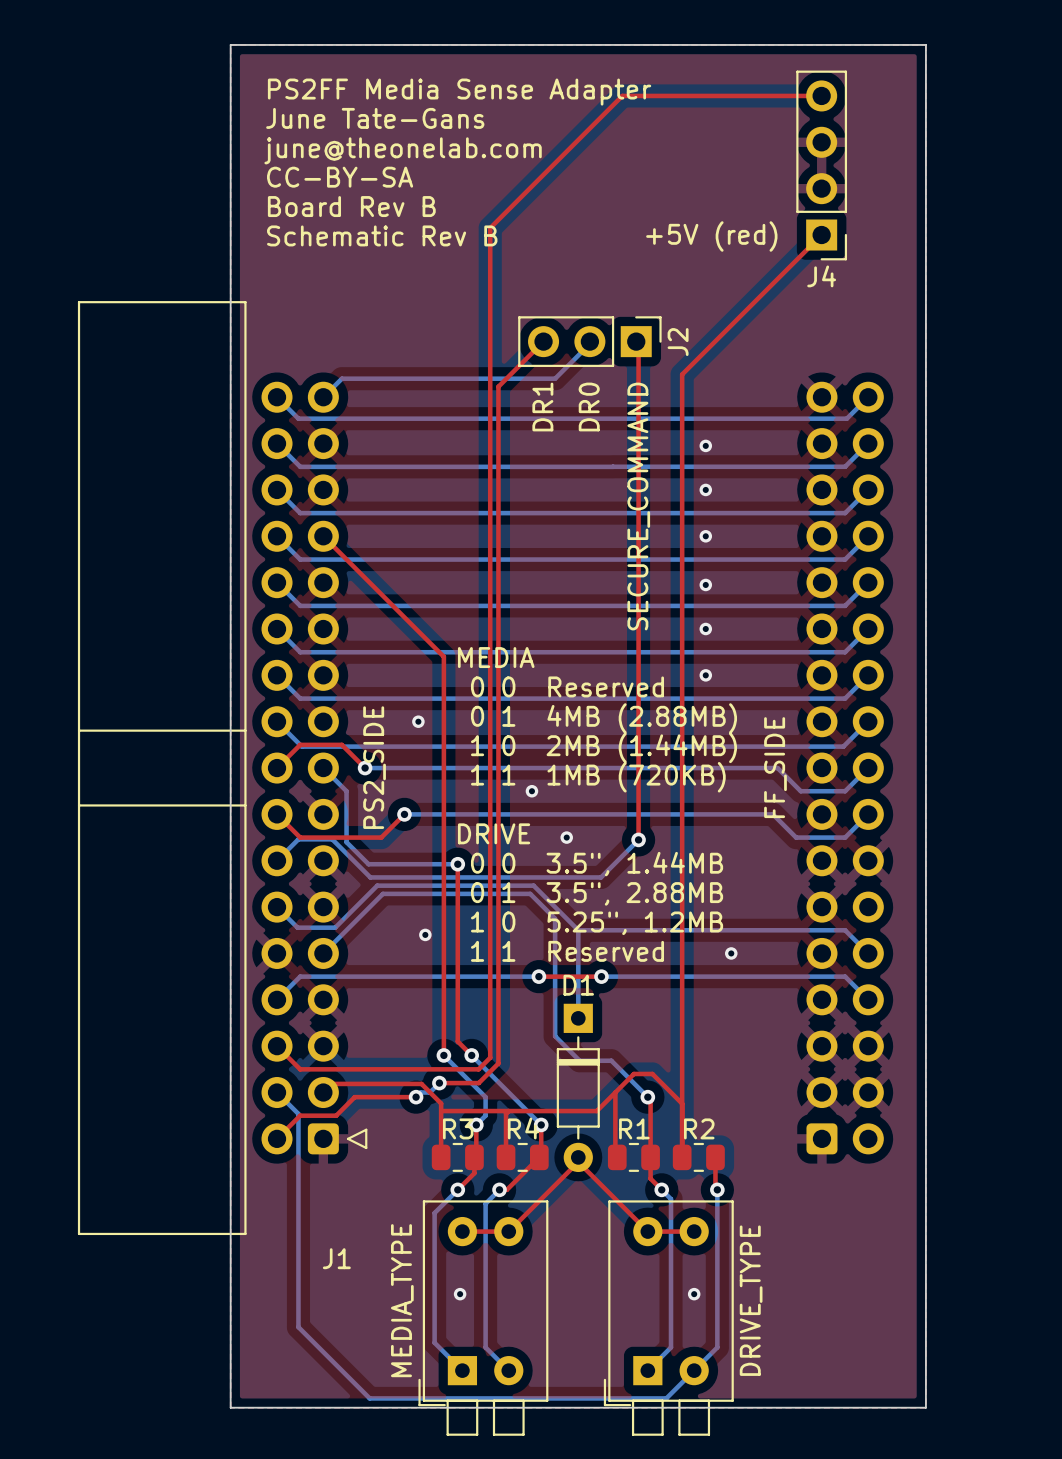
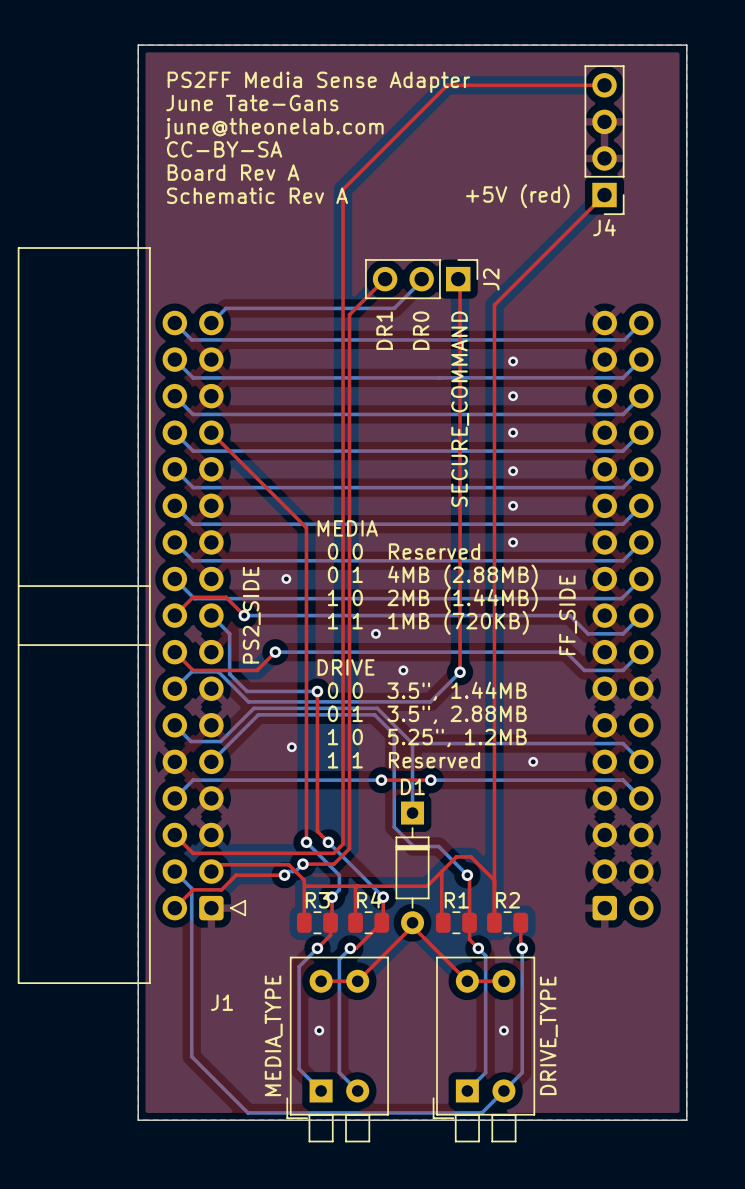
text: Board Rev B (351, 206) -> Board Rev A (233, 172)
text: Schematic Rev B (382, 235) -> Schematic Rev A (257, 195)

